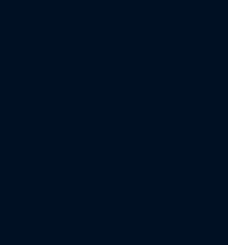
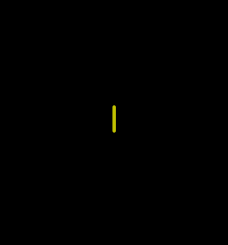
board edge: none -> (114, 106) (114, 130)

